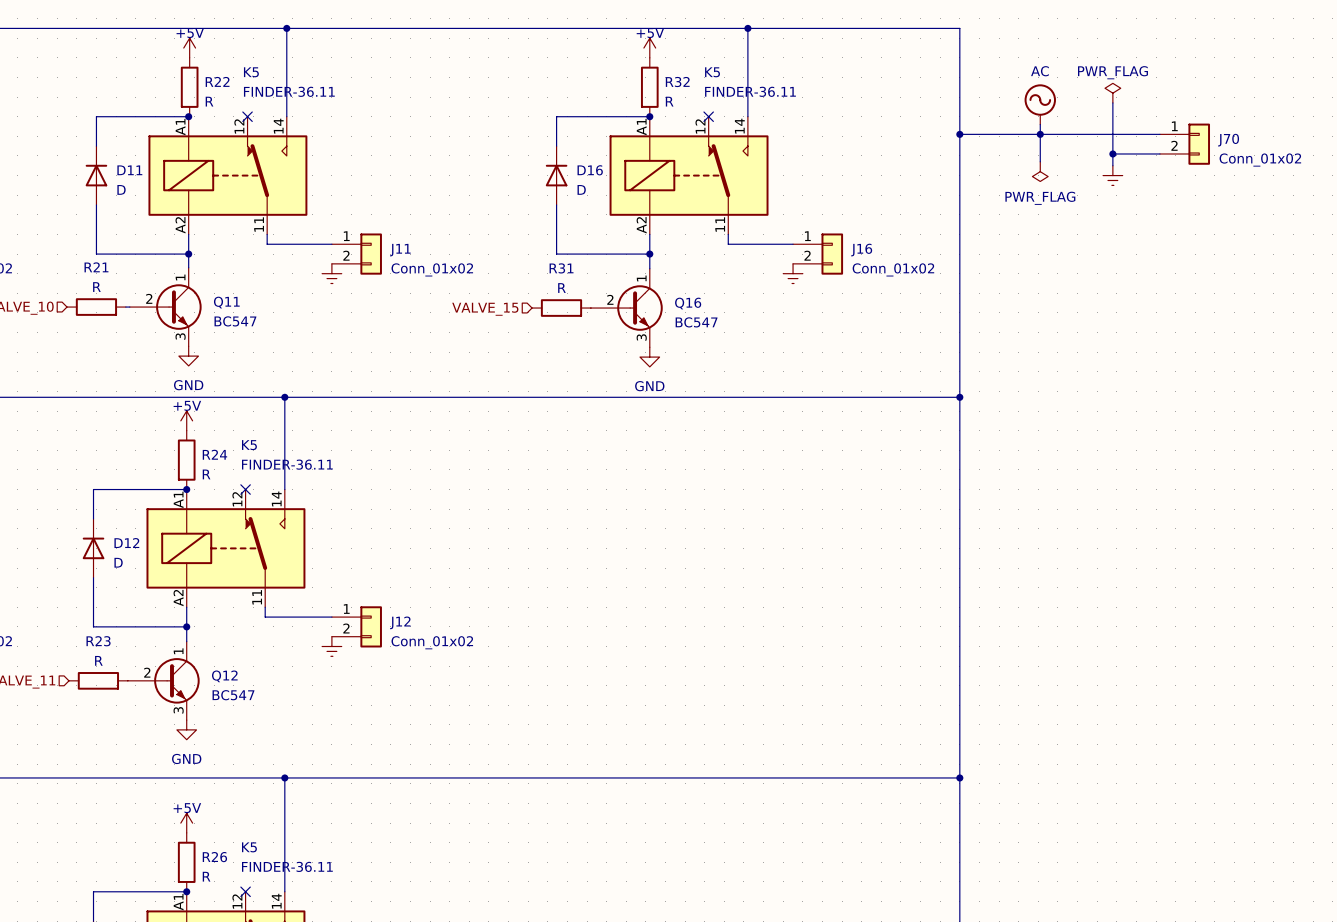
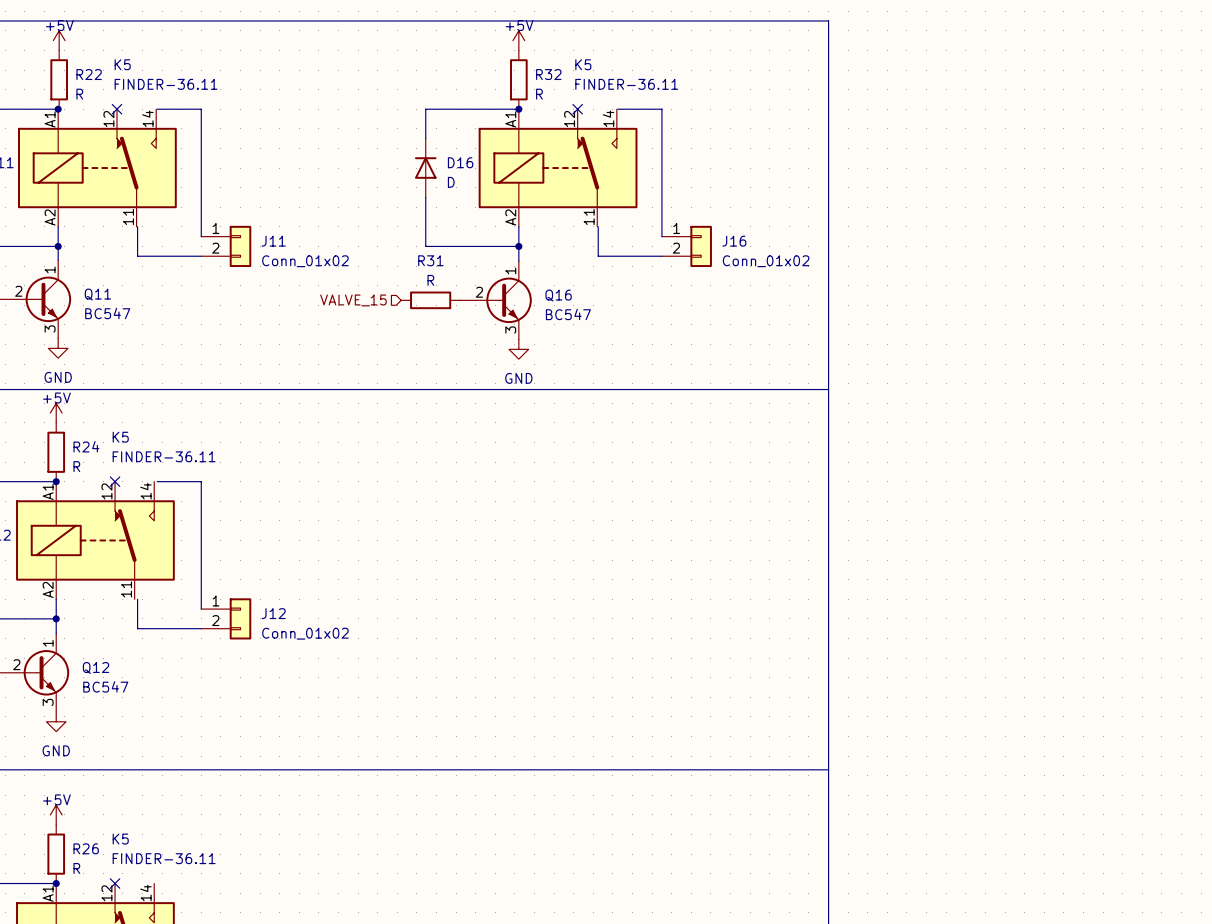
wire: (286, 28) (286, 116) -> none
junction: (286, 28) -> none
wire: (747, 28) (747, 116) -> none
junction: (747, 28) -> none
power symbol: PWR_FLAG (1112, 93) -> none
wire: (1112, 102) (1112, 165) -> none
power symbol: AC (1040, 104) -> none
wire: (1040, 124) (1040, 161) -> none
wire: (959, 134) (1159, 134) -> none
junction: (959, 134) -> none
junction: (1040, 134) -> none
J70: Conn_01x02 (1184, 144) -> none
wire: (1112, 153) (1159, 153) -> none
junction: (1112, 153) -> none
power symbol: PWR_FLAG (1040, 171) -> none
power symbol: (1112, 175) -> none
wire: (267, 234) (267, 244) (331, 244) -> (157, 109) (201, 109) (201, 236)
wire: none -> (137, 226) (137, 256) (201, 256)
wire: (728, 234) (728, 244) (793, 244) -> (617, 109) (661, 109) (661, 236)
wire: none -> (598, 226) (598, 256) (661, 256)
power symbol: (331, 273) -> none
power symbol: (793, 273) -> none
wire: (284, 397) (284, 489) -> none
junction: (284, 397) -> none
junction: (959, 397) -> none
wire: (265, 607) (265, 617) (331, 617) -> (157, 481) (201, 481) (201, 609)
wire: none -> (137, 599) (137, 628) (201, 628)
power symbol: (331, 646) -> none
wire: (284, 777) (284, 891) -> none
junction: (284, 777) -> none
junction: (959, 777) -> none

